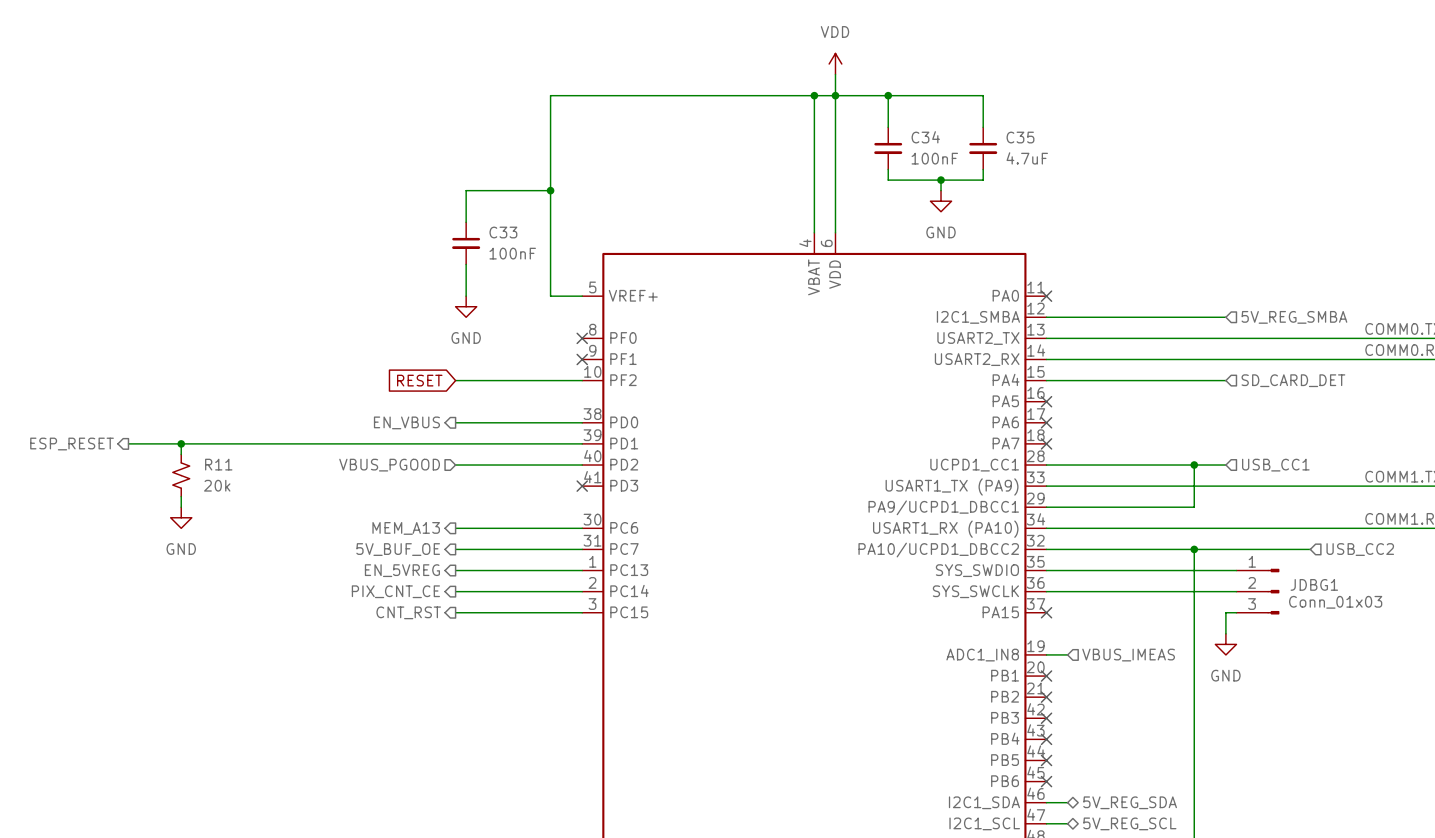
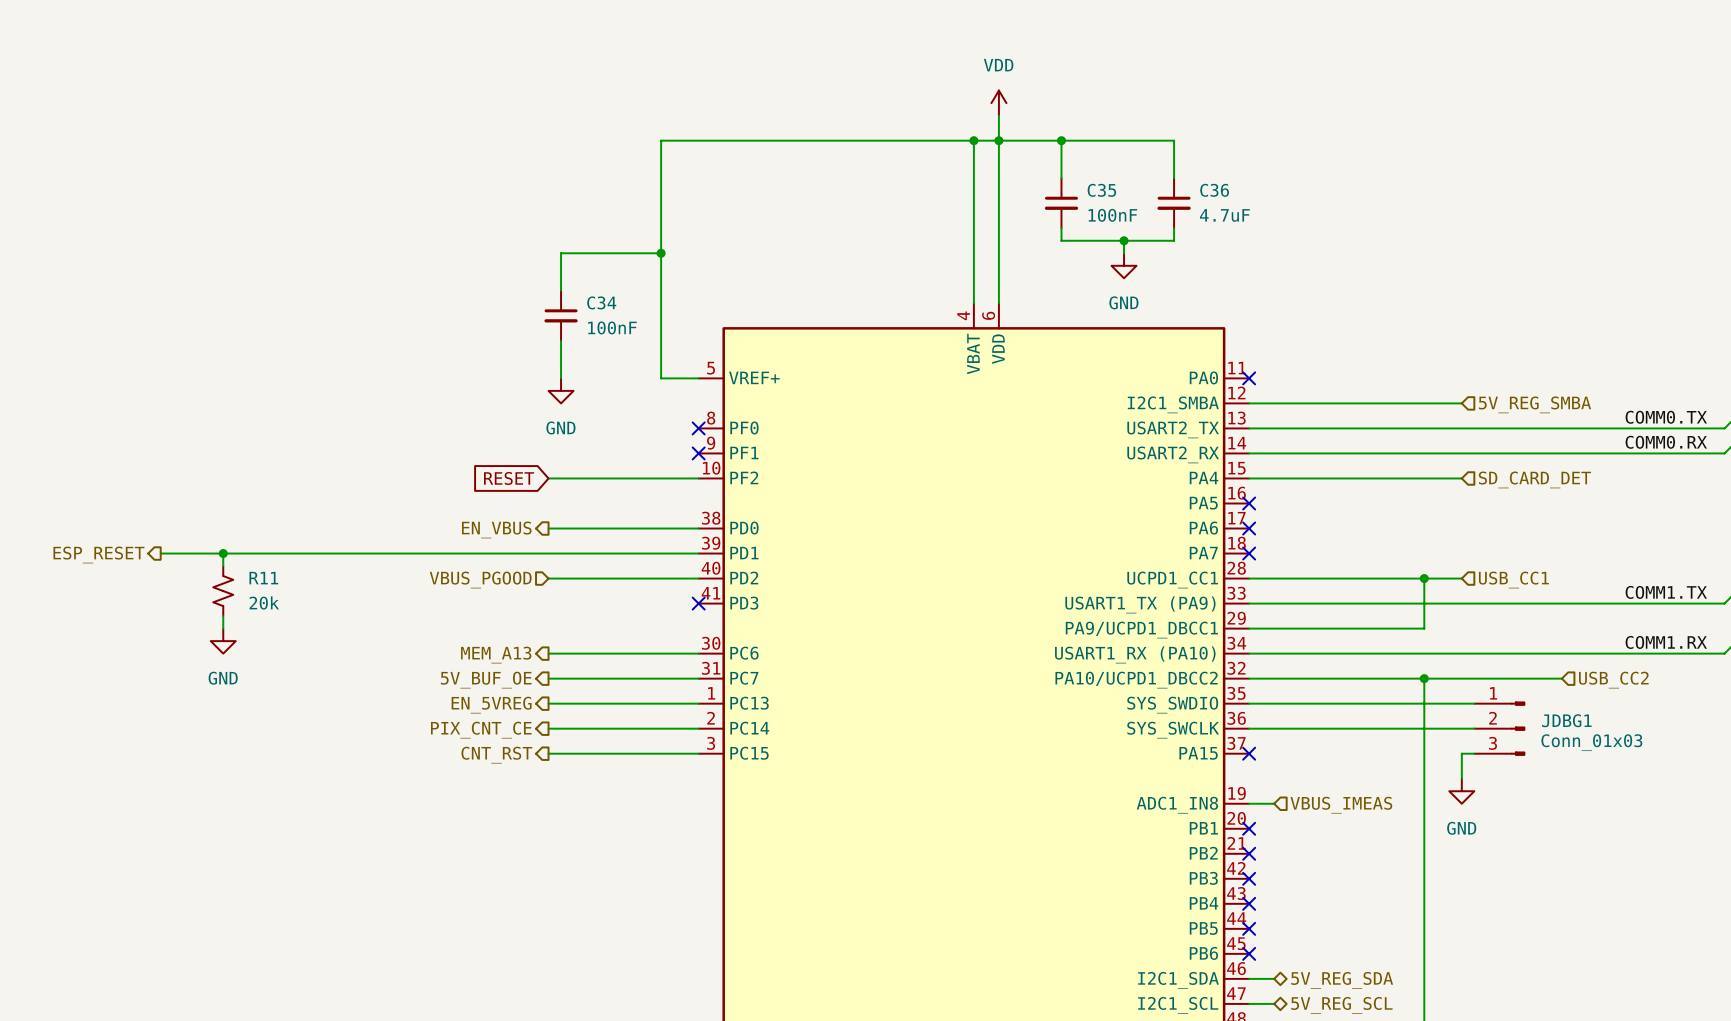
C34 name: C34 (925, 137) -> C35 (1101, 190)
C35 name: C35 (1020, 137) -> C36 (1214, 190)
C33 name: C33 (503, 232) -> C34 (601, 302)

